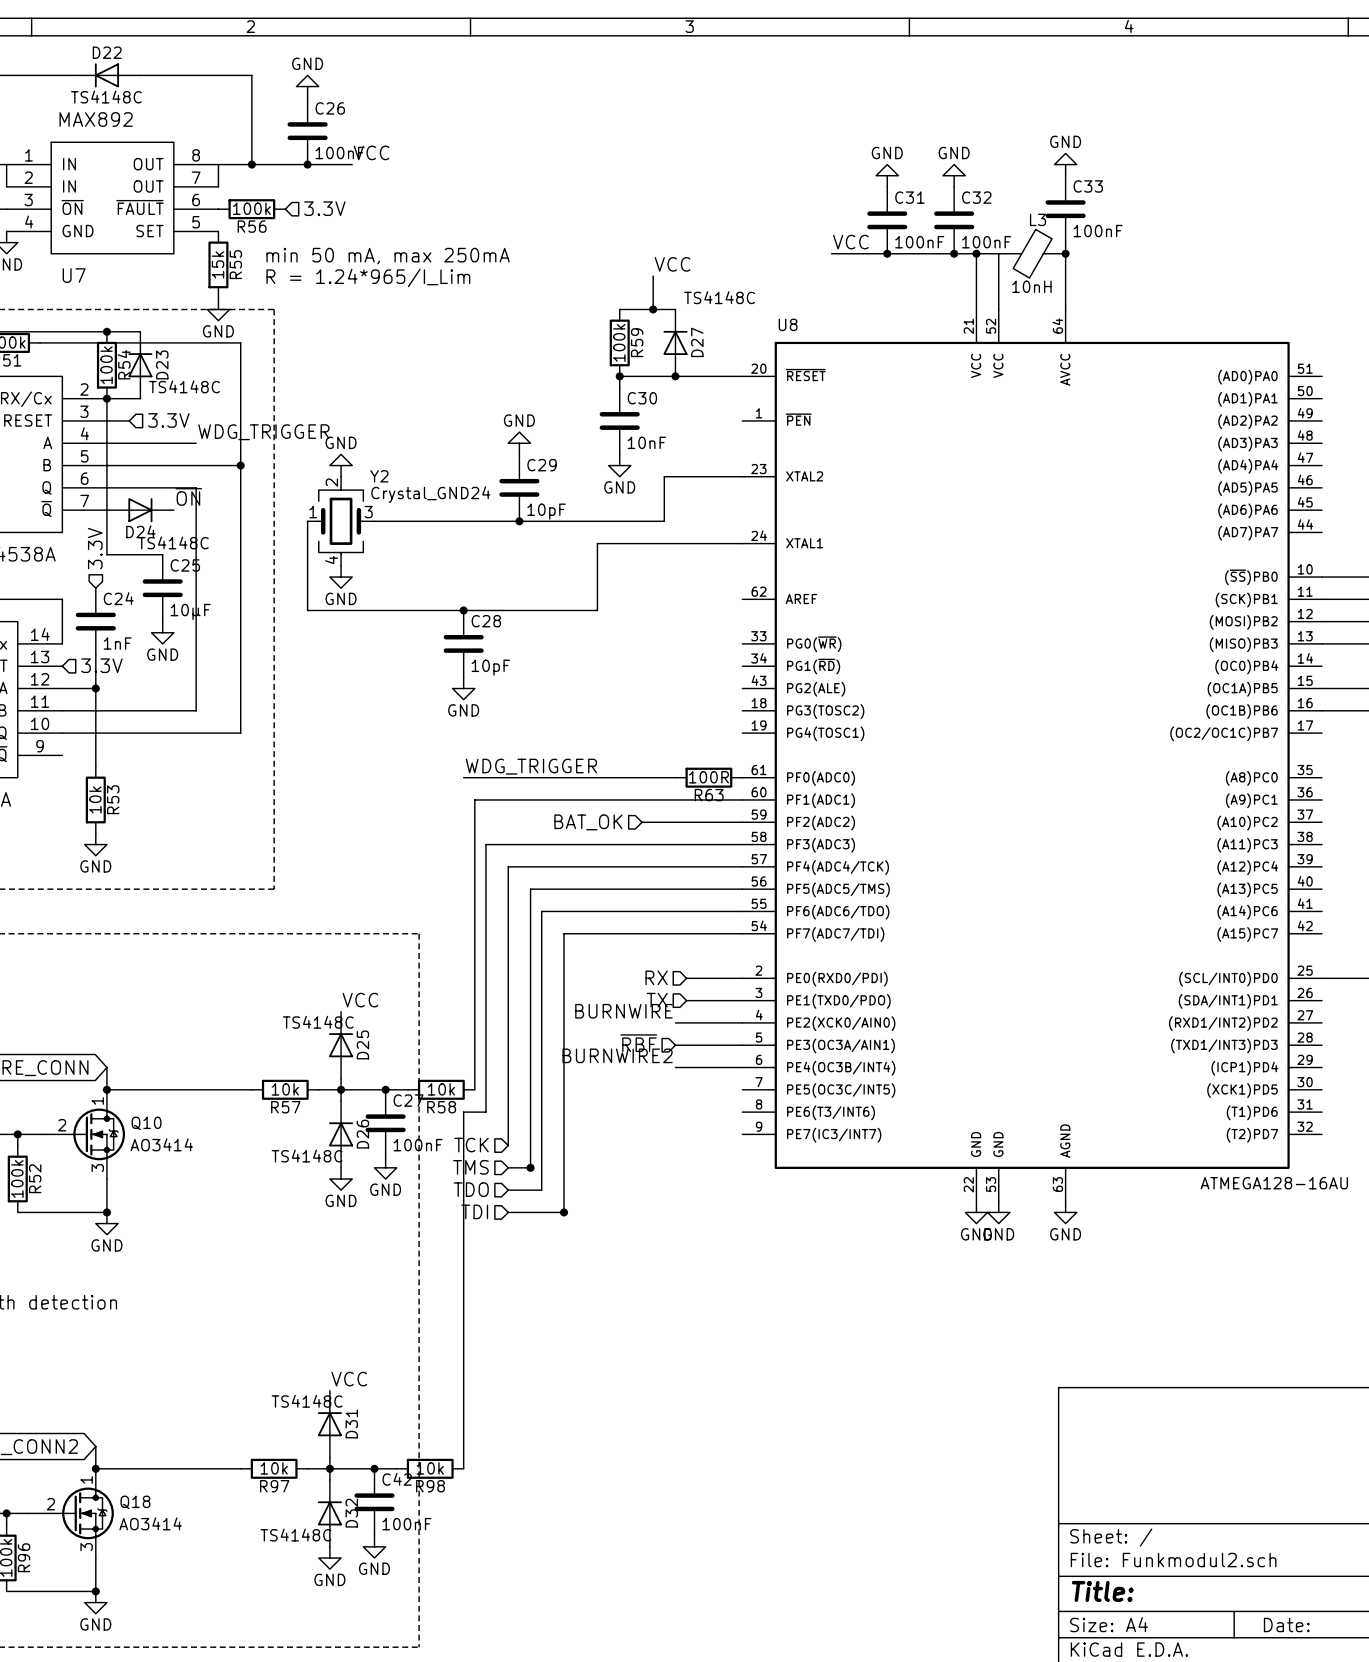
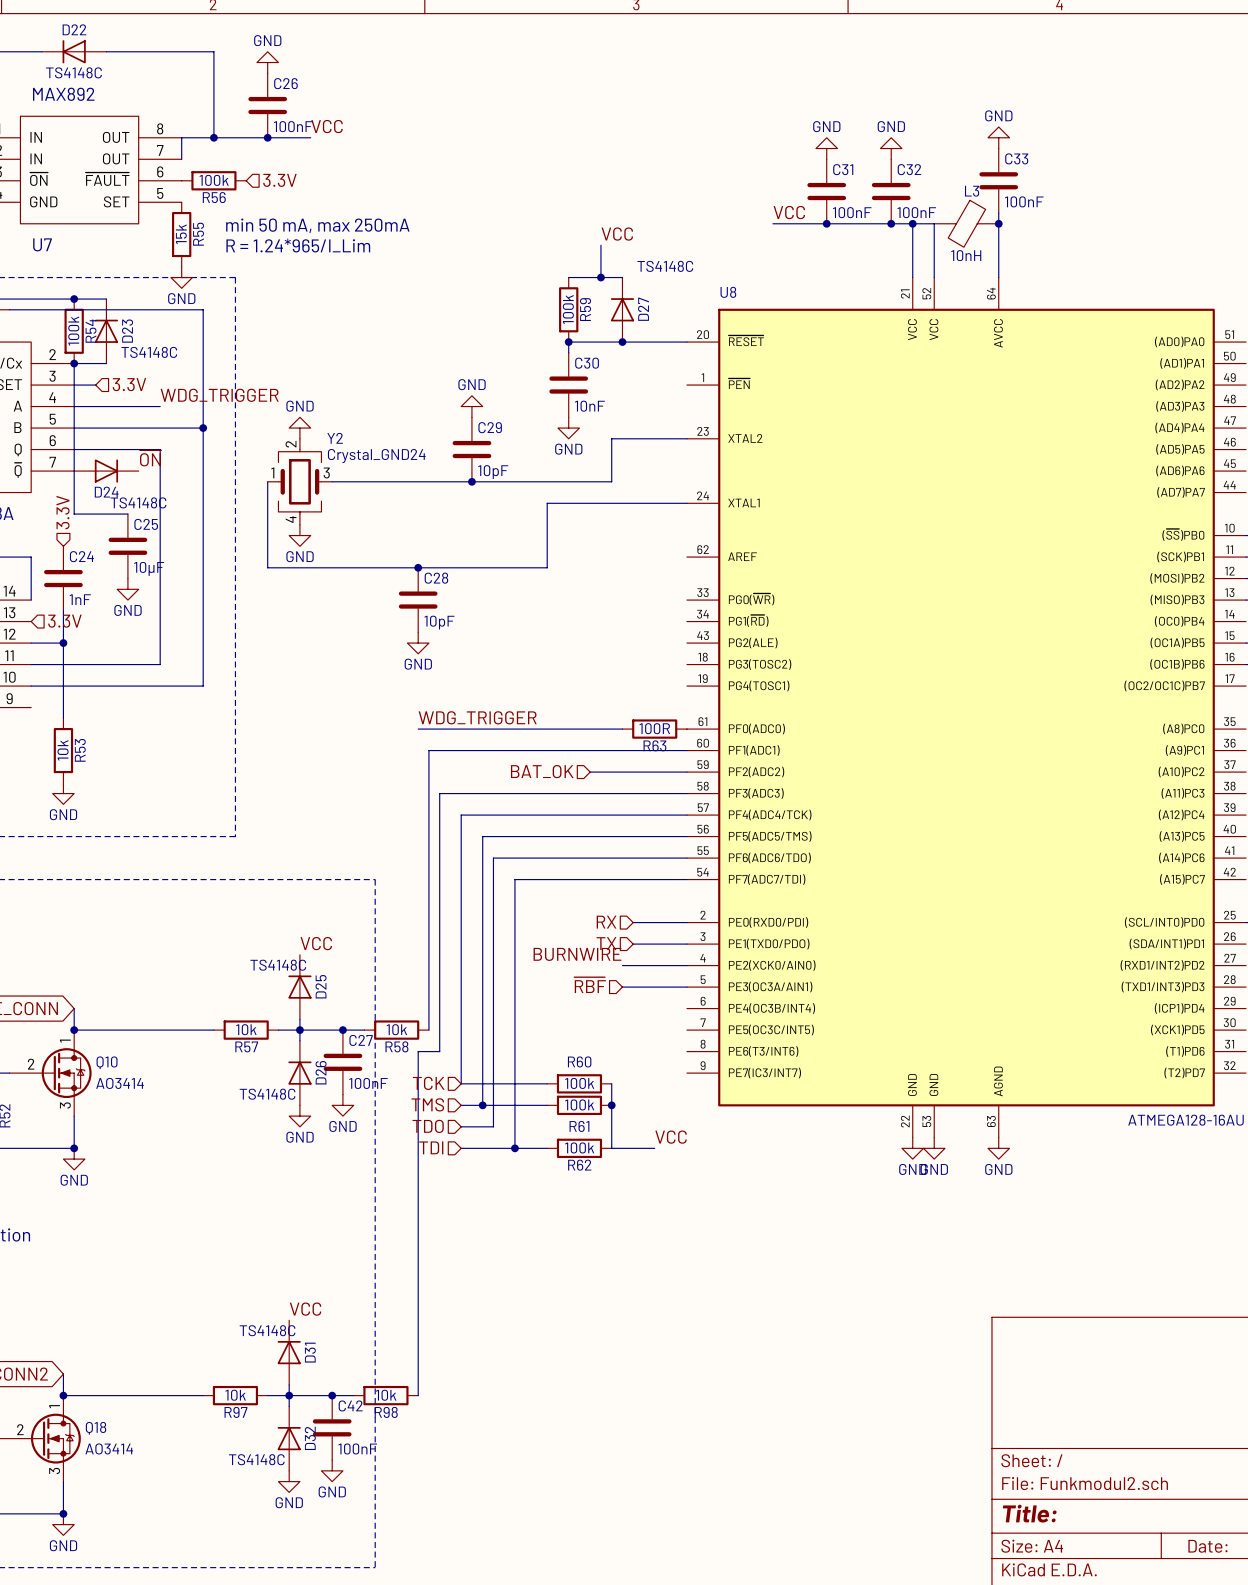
label: BURNWIRE2 (617, 1055) -> none
wire: (675, 1067) (742, 1067) -> (482, 1105) (547, 1105)
wire: none -> (461, 1083) (547, 1083)
R60: none -> 100k (579, 1083)
wire: none -> (611, 1083) (611, 1148) (654, 1148)
R61: none -> 100k (579, 1105)
junction: none -> (611, 1105)
label: none -> VCC (671, 1137)
wire: none -> (514, 1148) (547, 1148)
R62: none -> 100k (579, 1148)

